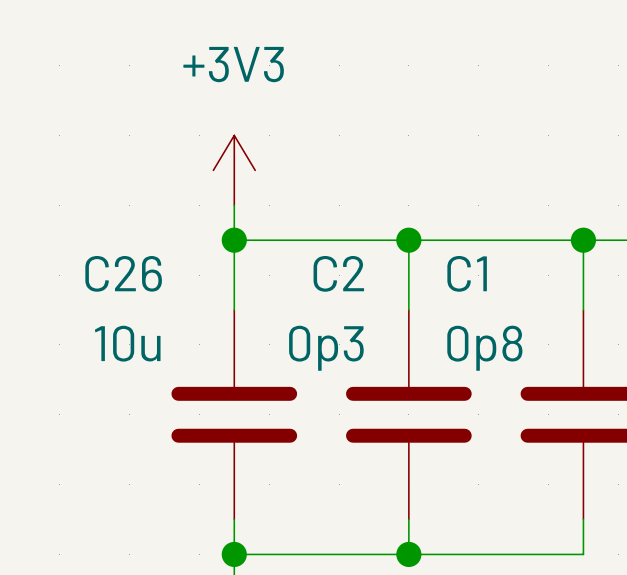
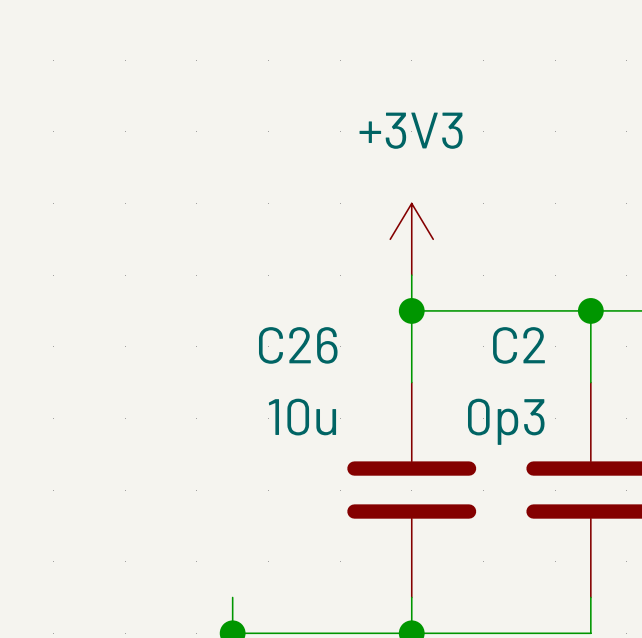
power symbol position: +3V3 (234, 170) -> +3V3 (411, 239)
wire: (234, 205) (234, 310) -> none
wire: (234, 240) (408, 240) -> (411, 275) (411, 310)
junction: (234, 240) -> none
C2 name: C2 (338, 273) -> C26 (298, 345)
C1 name: C1 (467, 273) -> C2 (518, 345)
C2 value: 0p3 (326, 348) -> 10u (302, 417)
C1 value: 0p8 (484, 348) -> 0p3 (506, 421)
C26: 10u (234, 414) -> none

